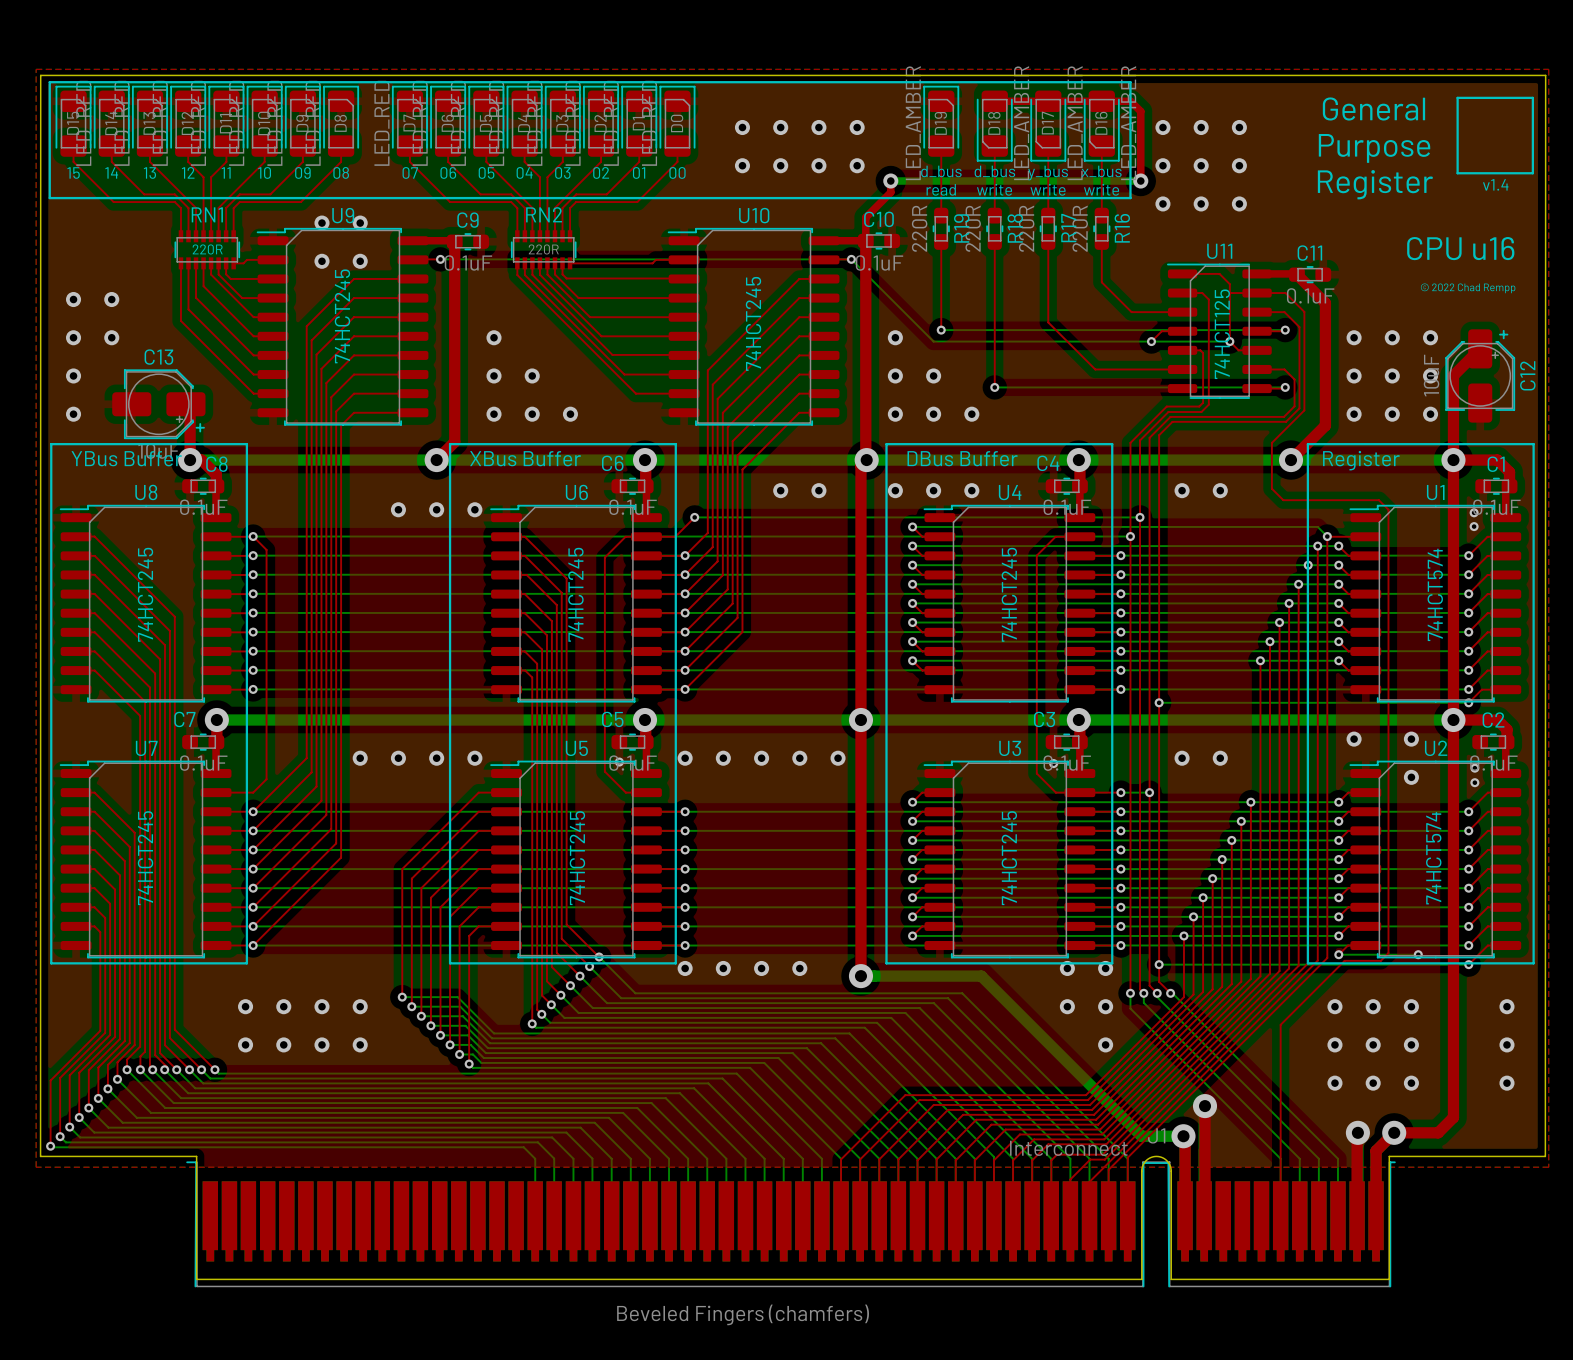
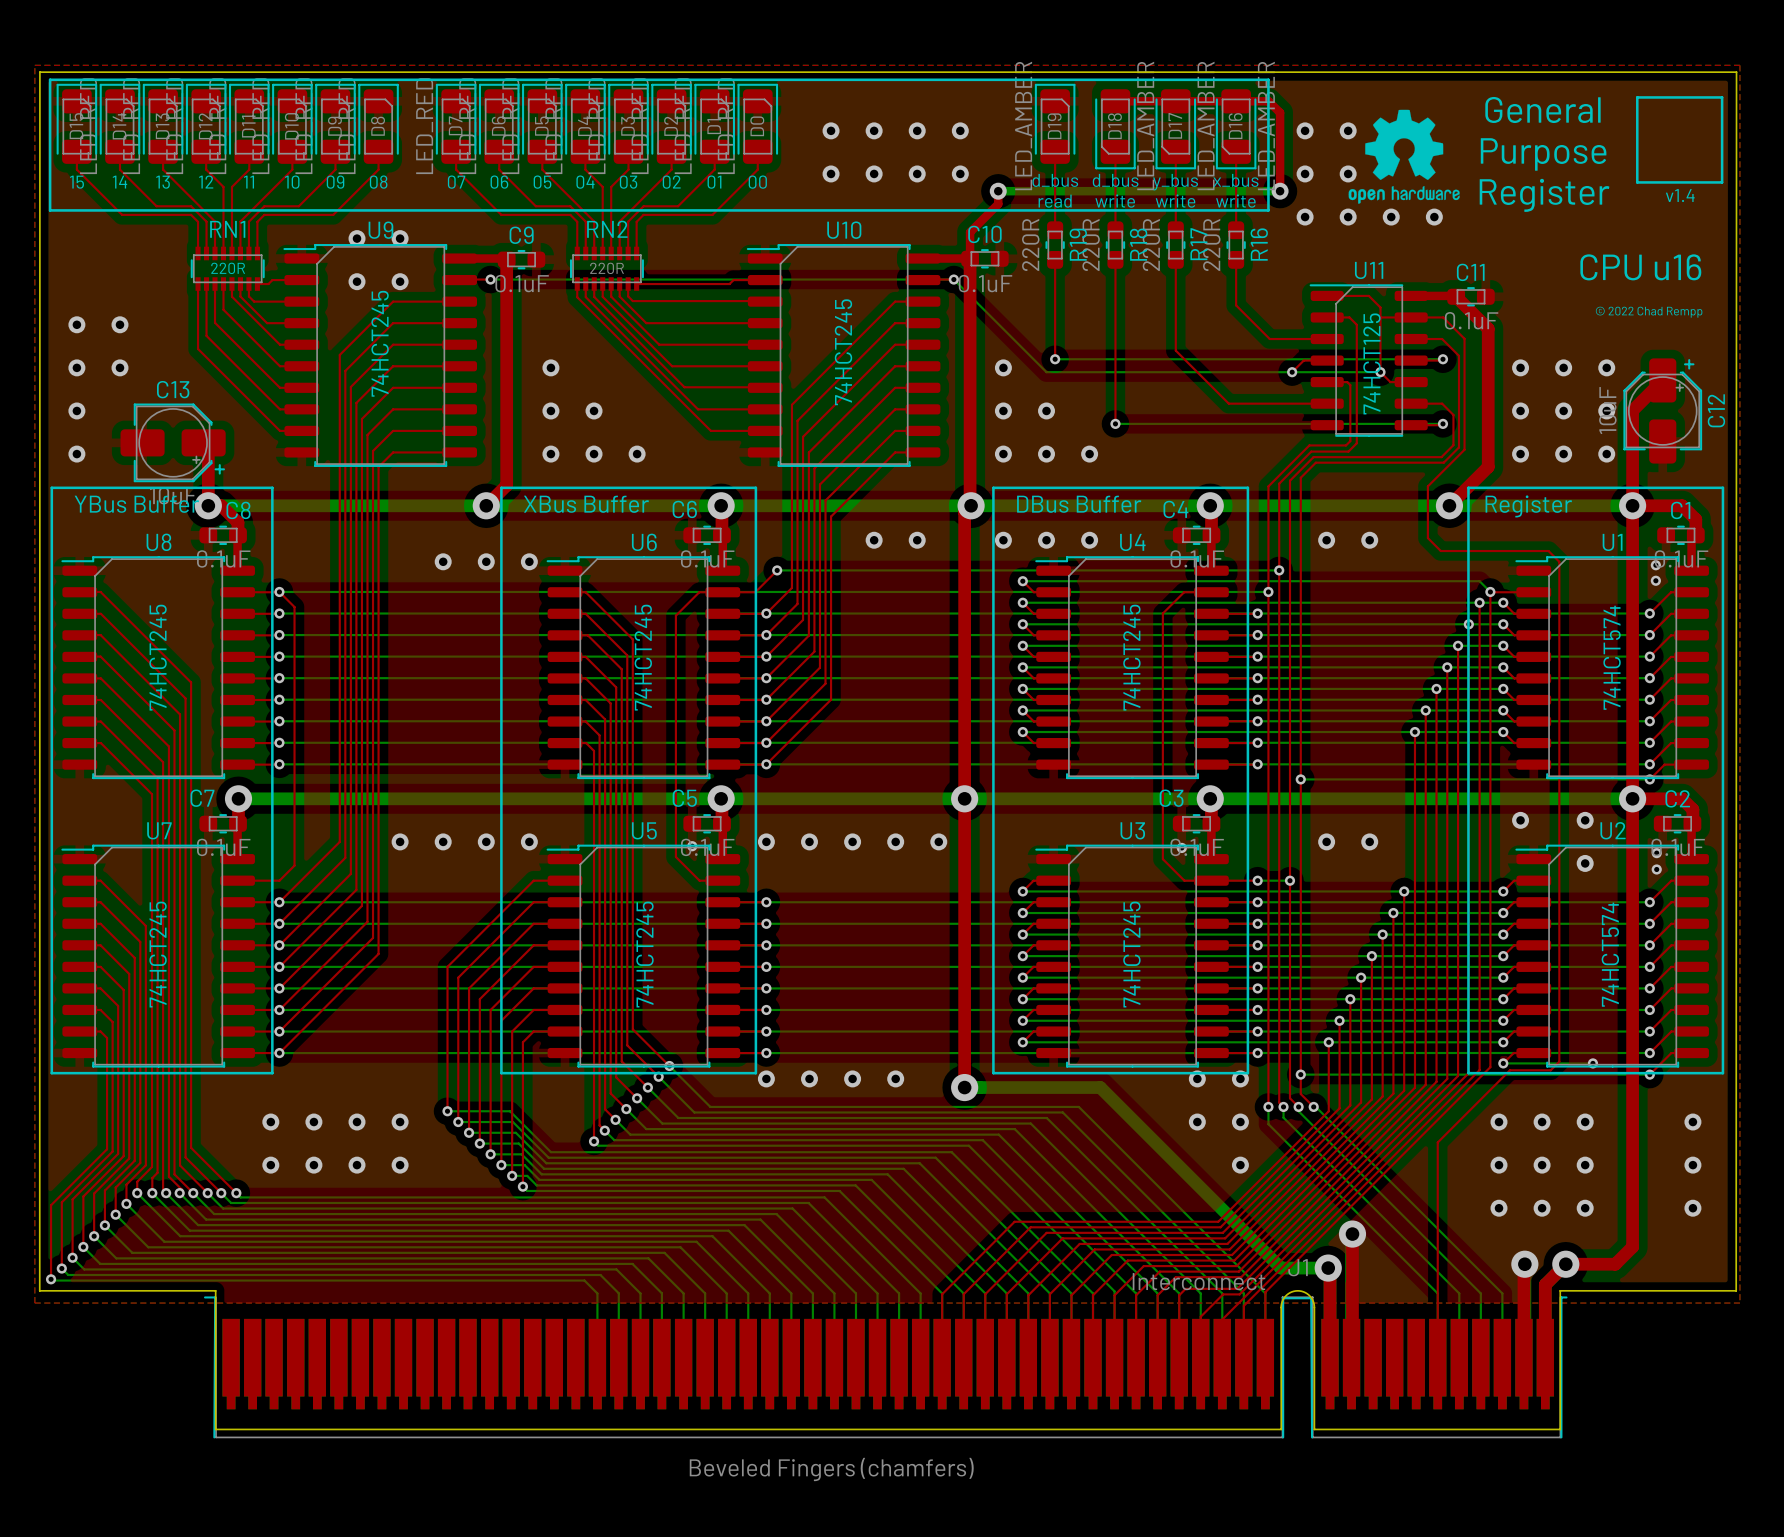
drawing: none -> [1348, 109, 1460, 204]
via: (1239, 127) -> none
via: (1239, 165) -> none
via: none -> (1434, 217)

